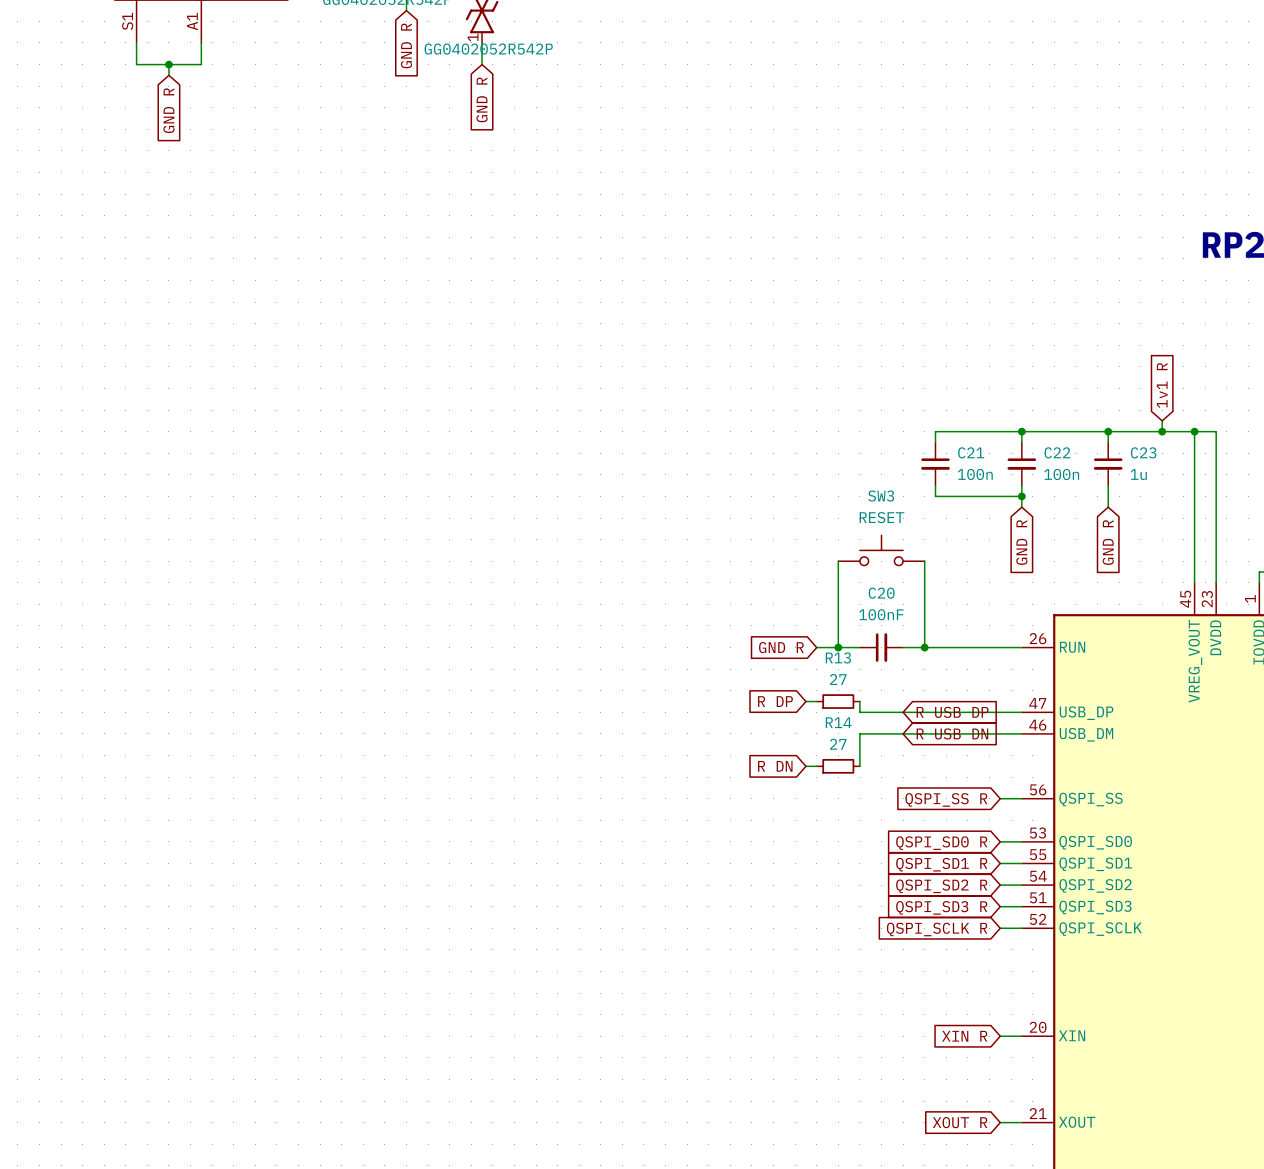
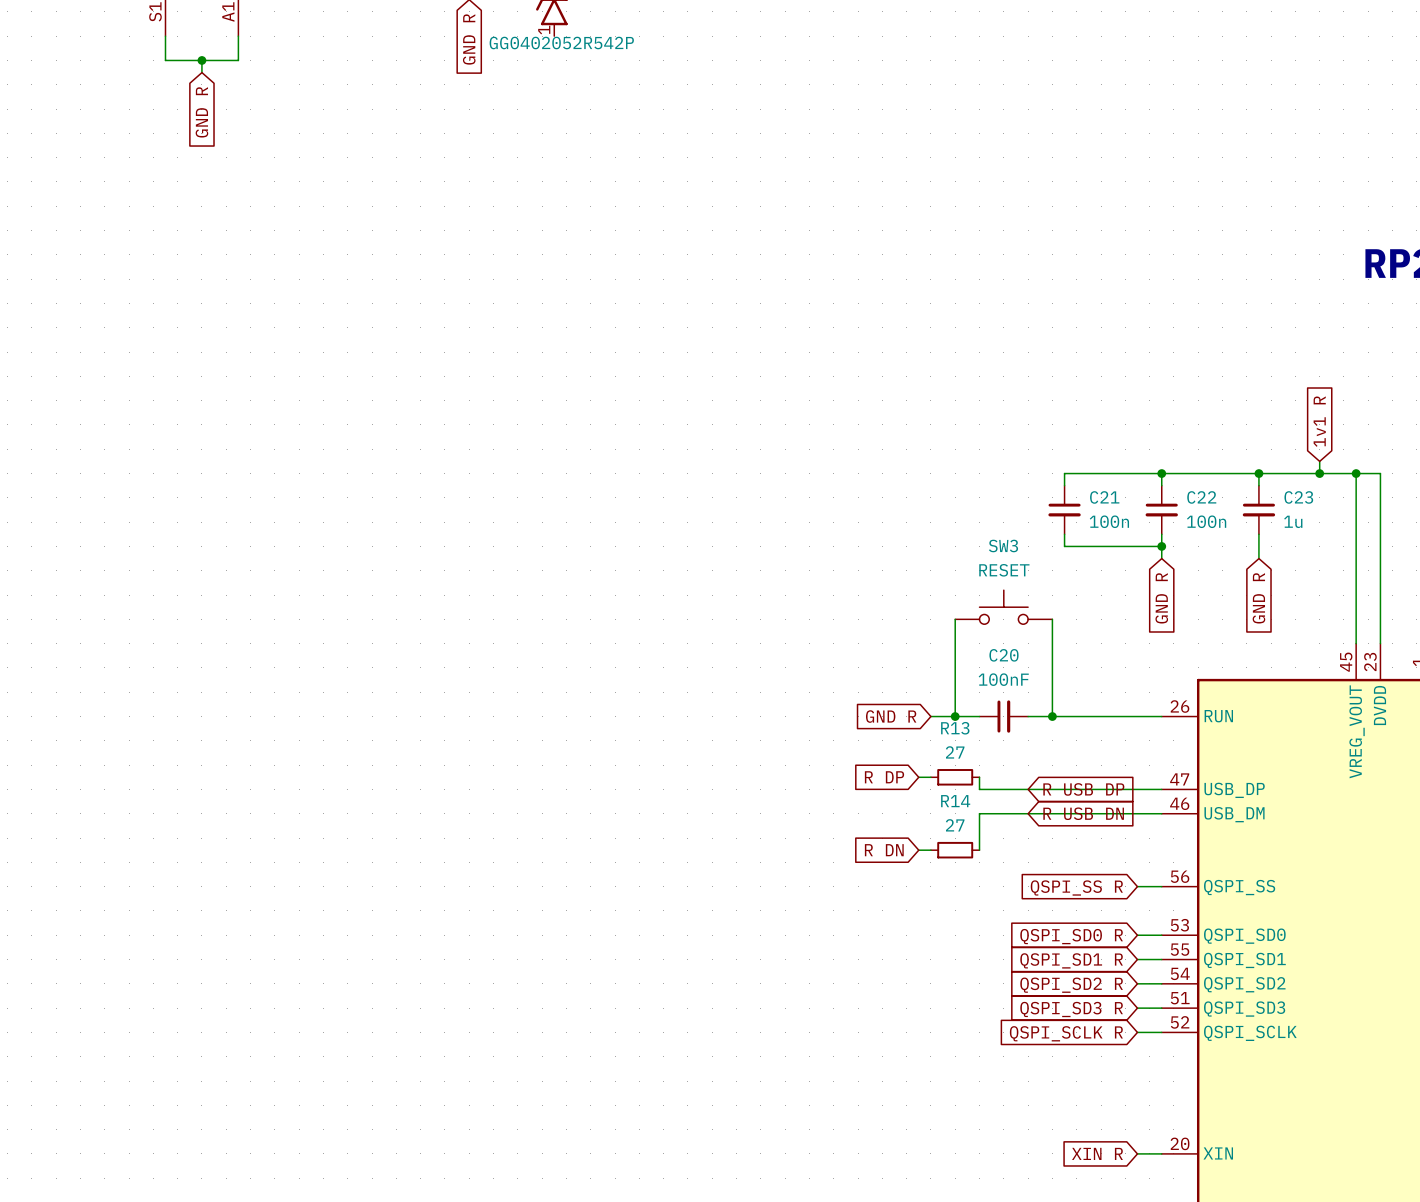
wire: (482, 42) (482, 64) -> none
global label: GND R (482, 99) -> none

